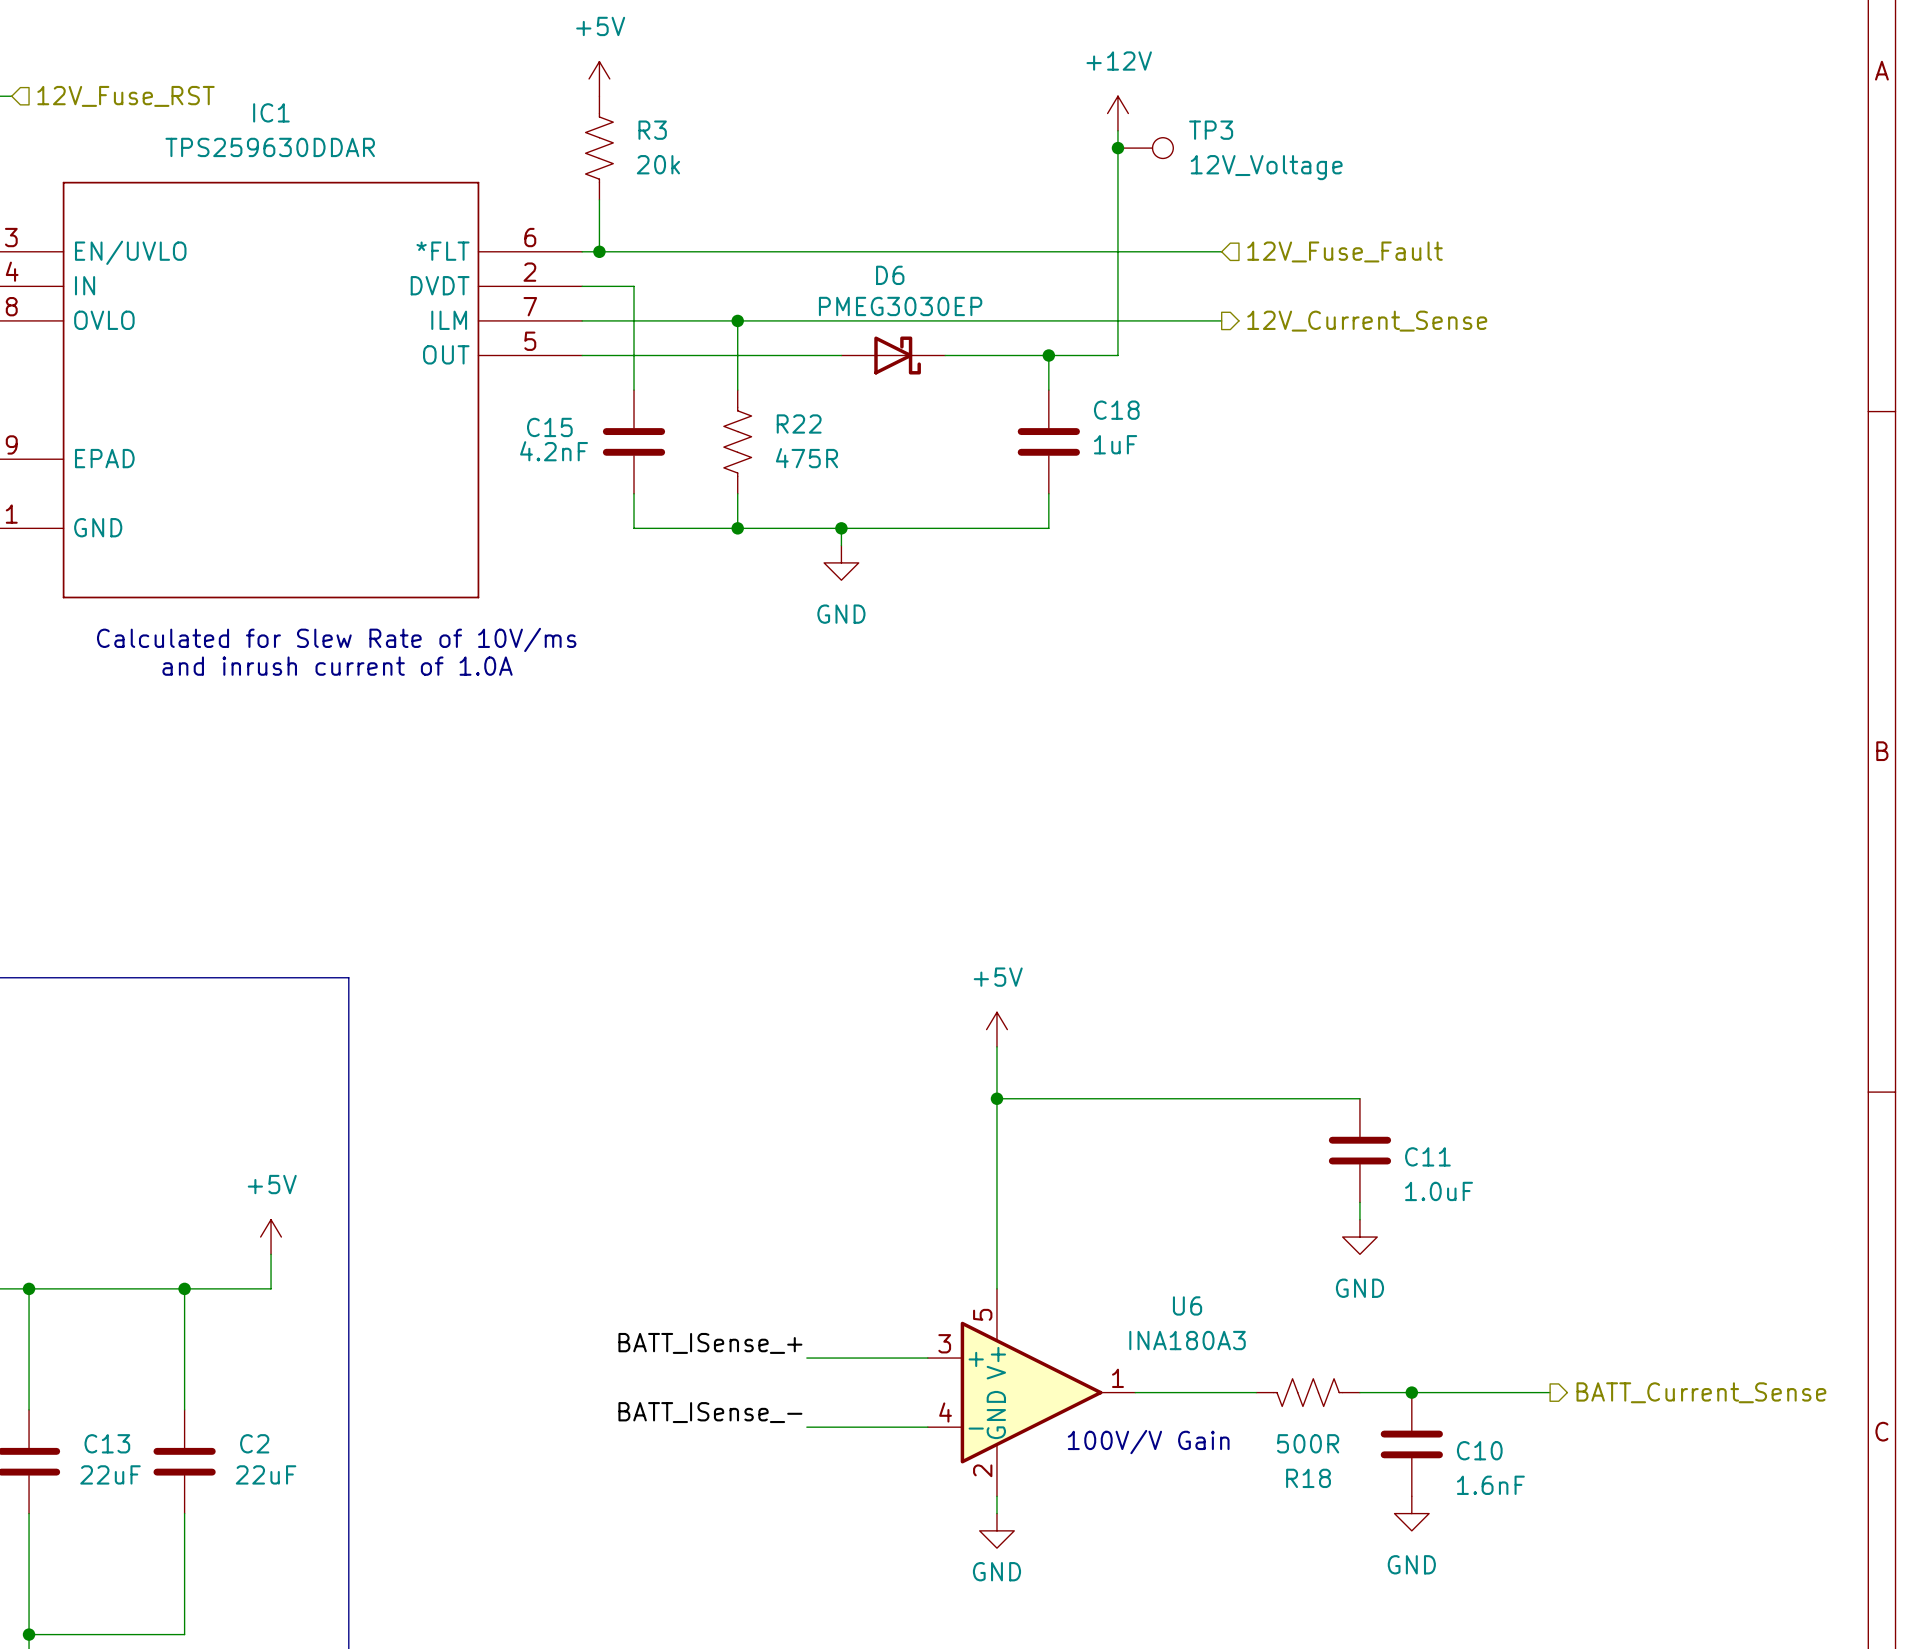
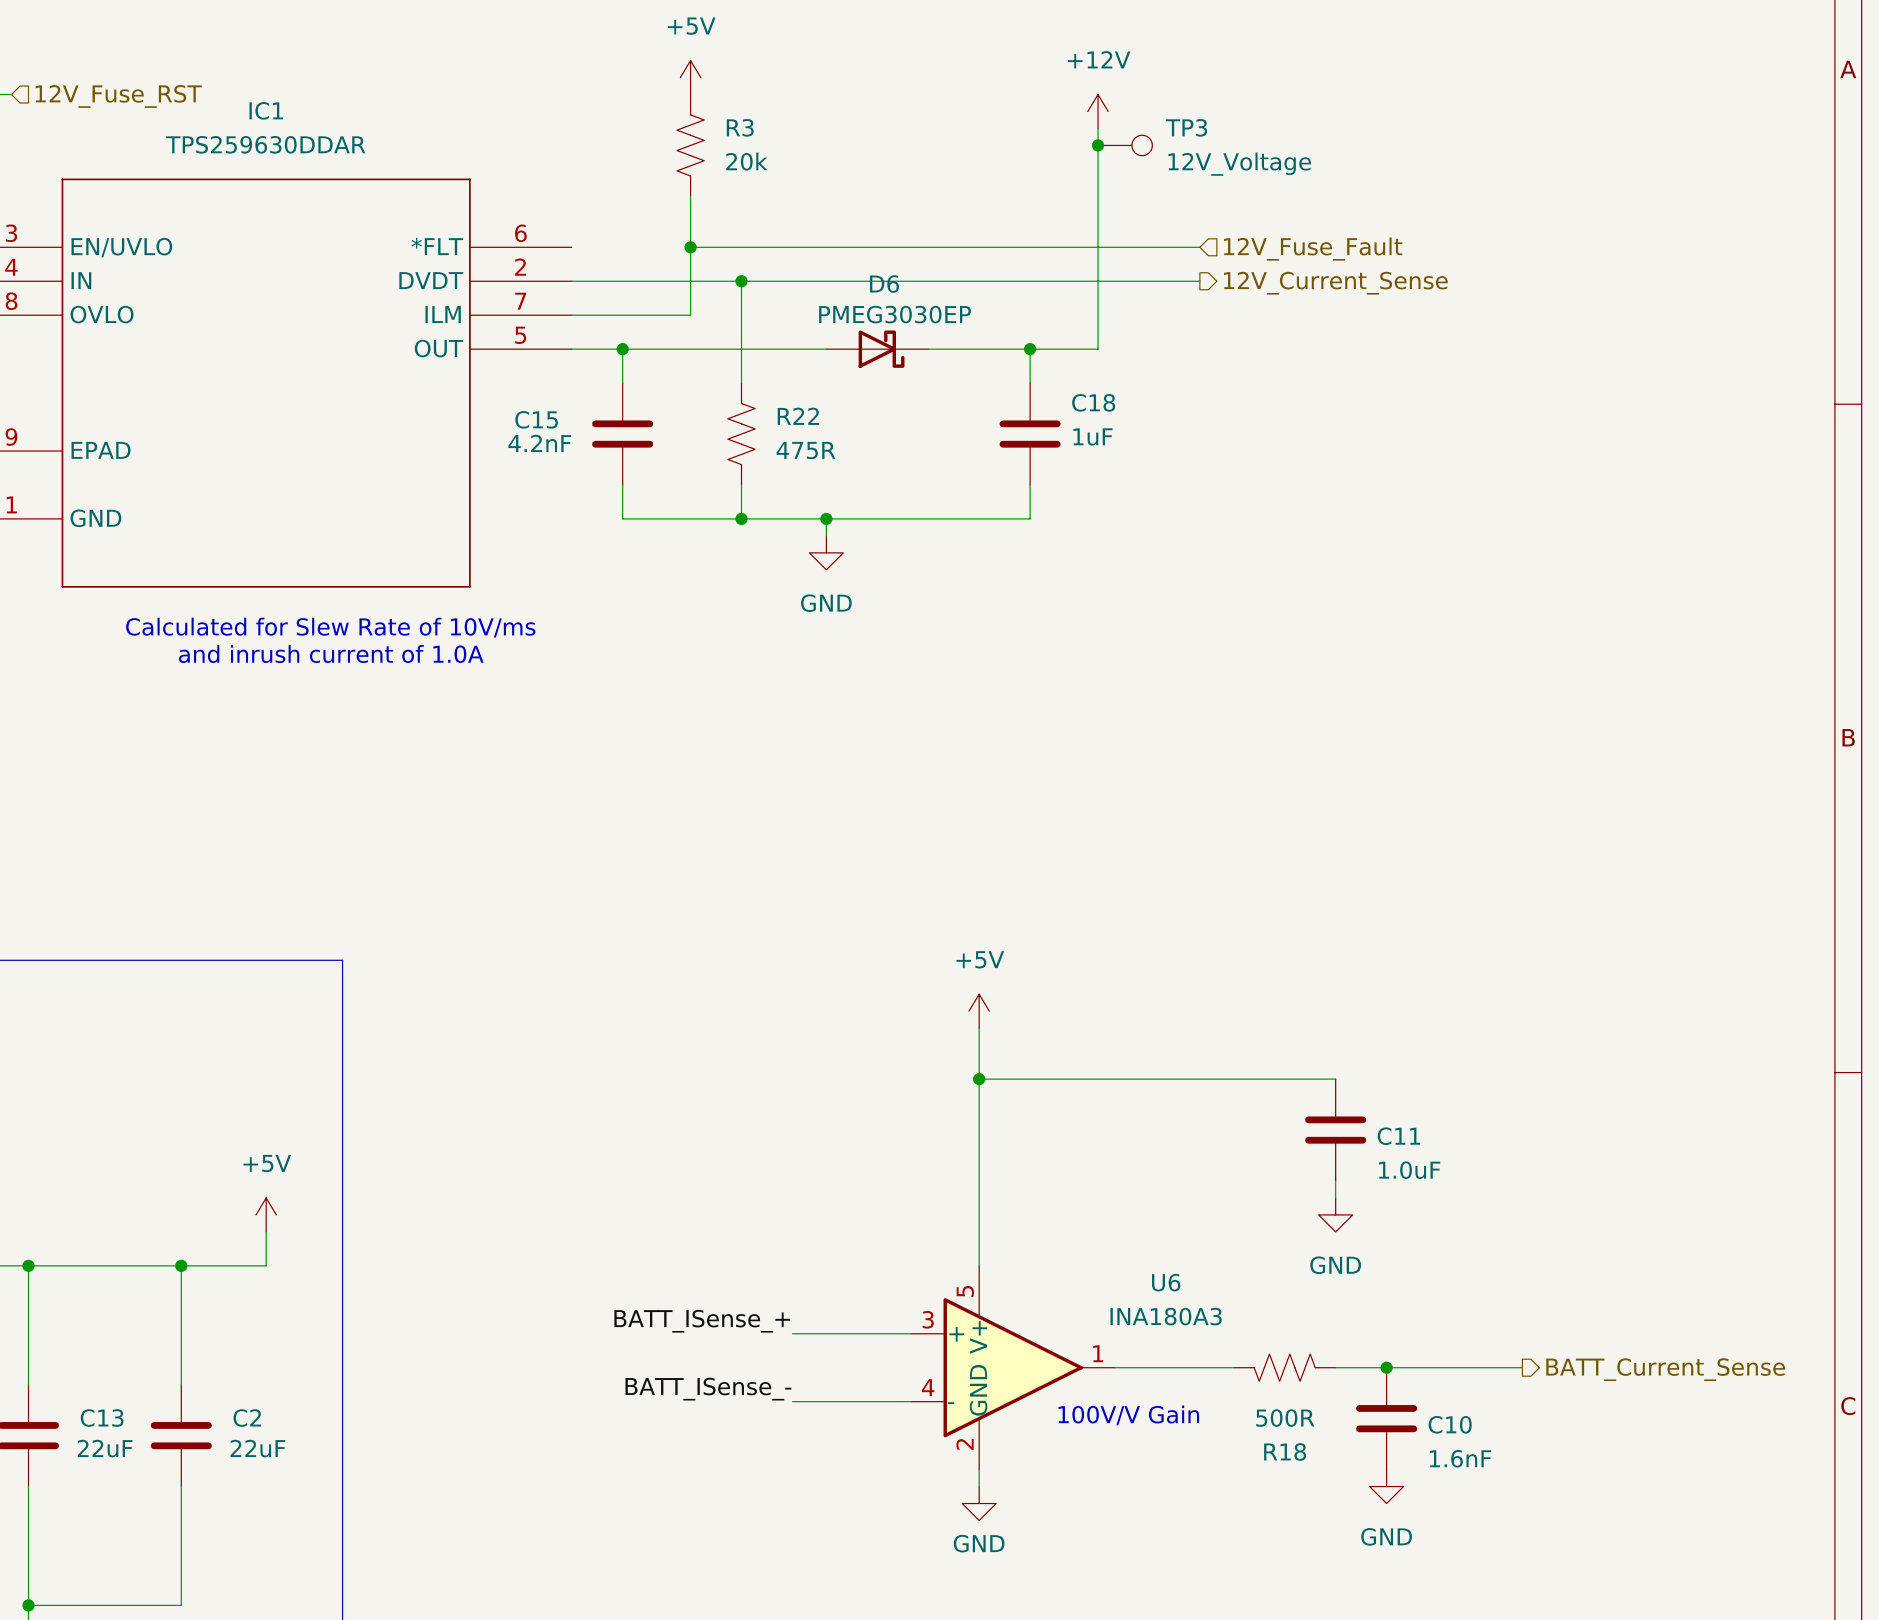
power symbol position: +5V (599, 78) -> +5V (690, 77)
R3 position: (599, 148) -> (690, 145)
wire: (599, 199) (599, 251) -> none
wire: (582, 251) (703, 251) -> none
junction: (599, 251) -> none
junction: none -> (690, 247)
D6 name position: D6 (890, 275) -> D6 (884, 284)
wire: (634, 286) (634, 355) -> (622, 281) (1199, 281)
wire: none -> (741, 281) (741, 383)
junction: none -> (741, 281)
D6 value position: PMEG3030EP (900, 306) -> PMEG3030EP (895, 314)
wire: (703, 320) (1221, 320) -> (690, 315) (690, 196)
wire: (737, 320) (737, 390) -> none
junction: (737, 320) -> none
hierarchical label position: 12V_Current_Sense (1367, 321) -> 12V_Current_Sense (1335, 283)
junction: none -> (622, 349)
R22 position: (737, 441) -> (741, 434)
wire: (737, 493) (737, 528) -> (741, 484) (741, 518)
junction position: (737, 528) -> (741, 518)

